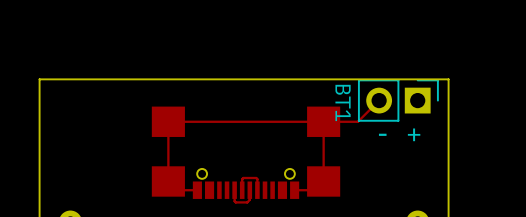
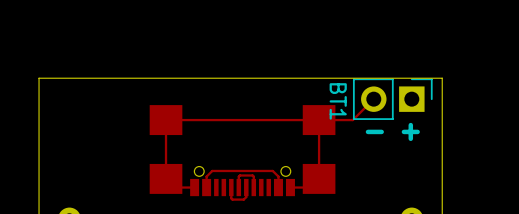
top track: none -> (278, 187) (278, 176) (272, 170) (212, 170) (206, 176) (206, 187)

